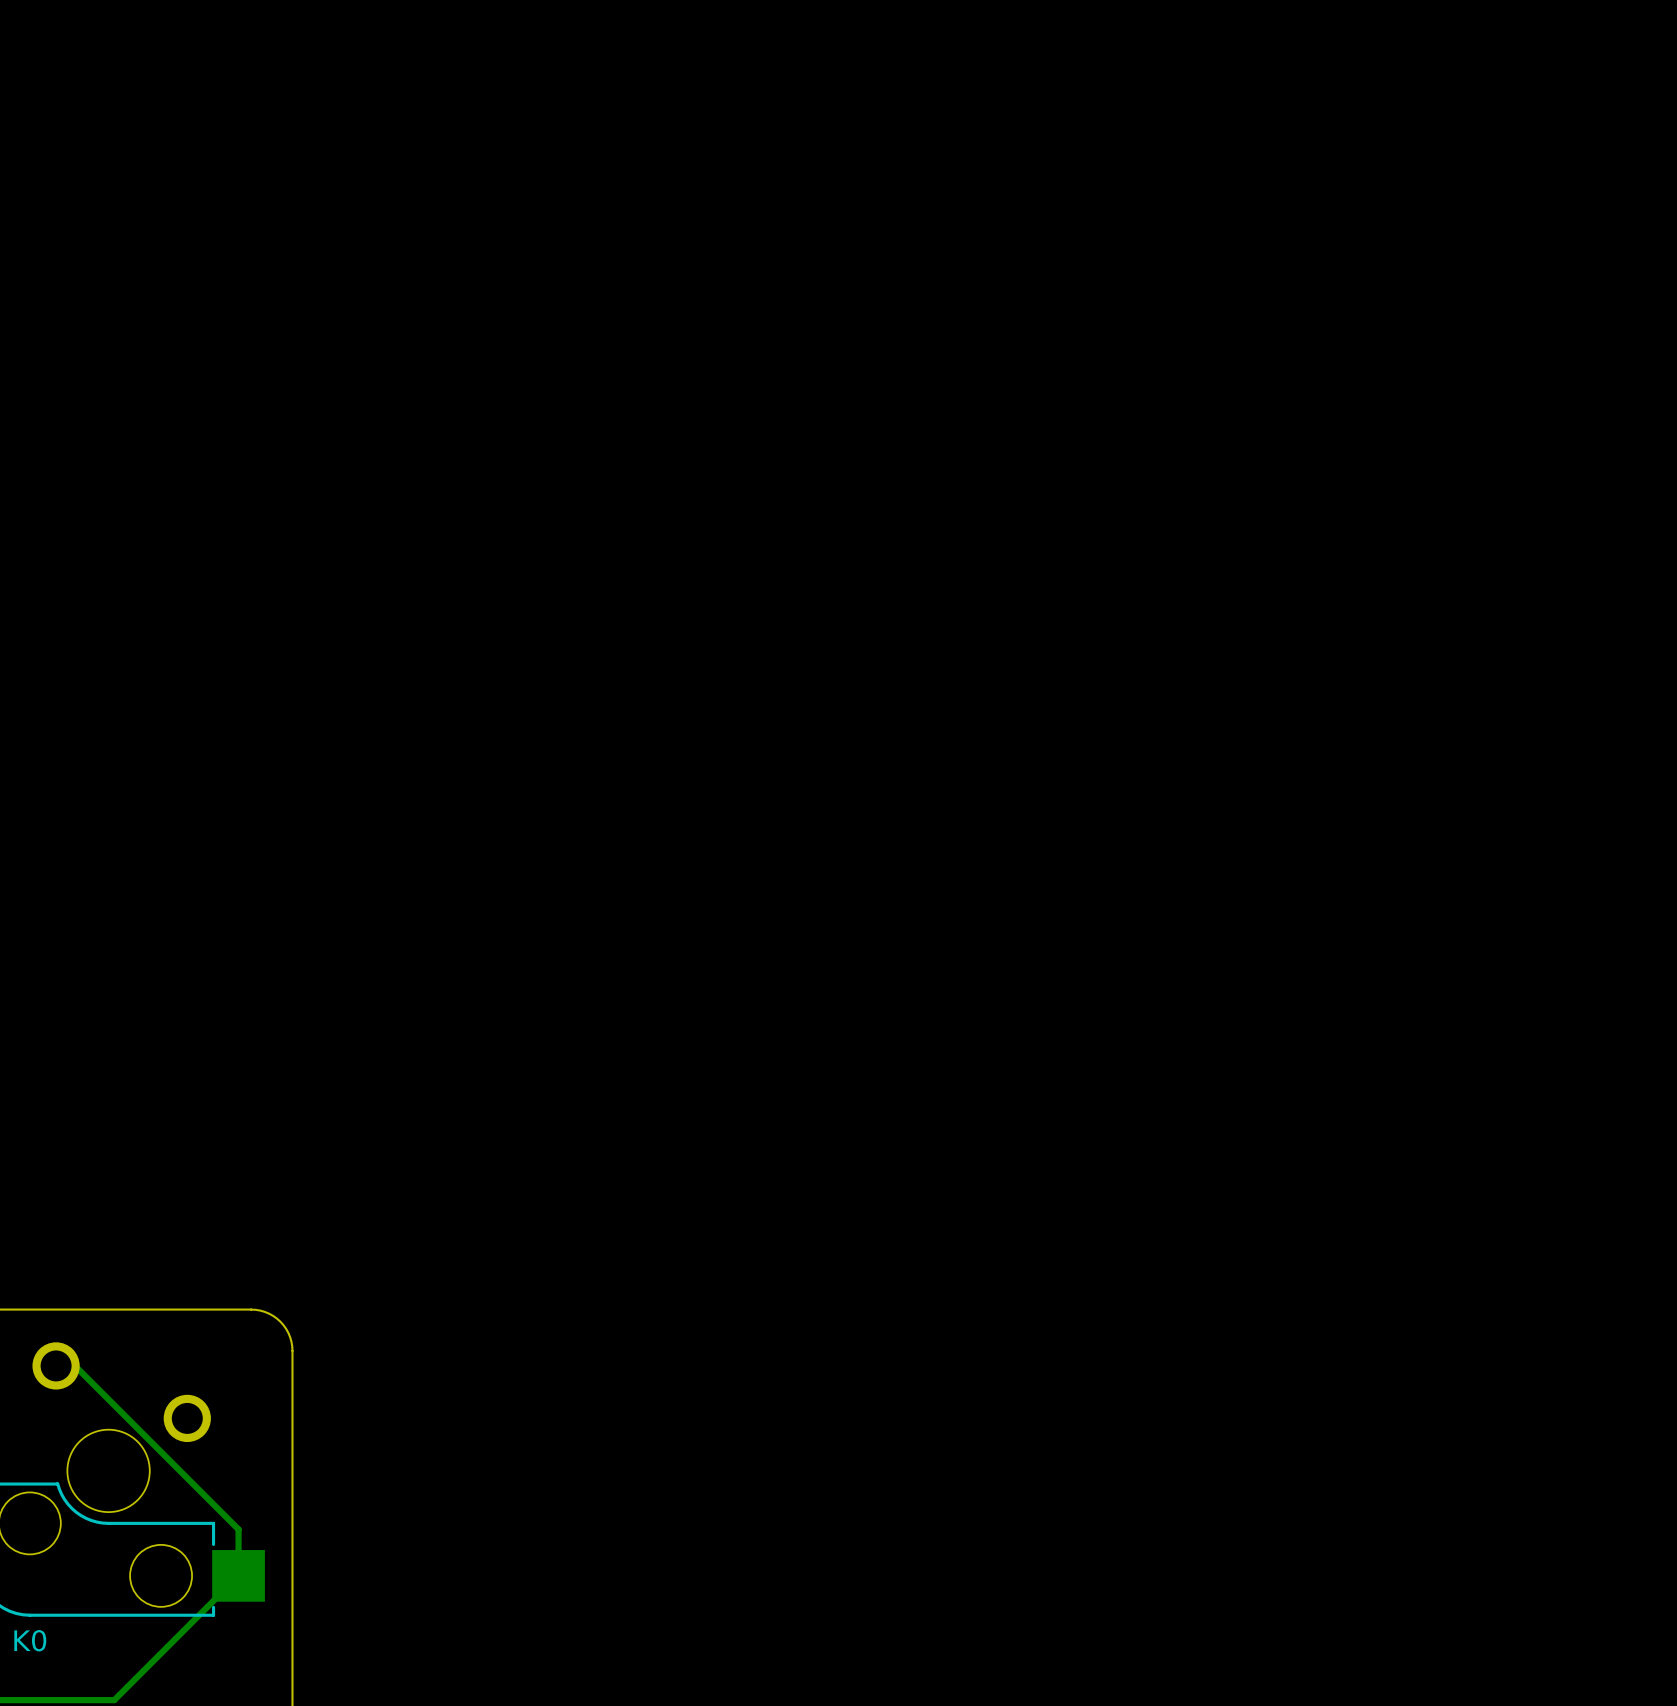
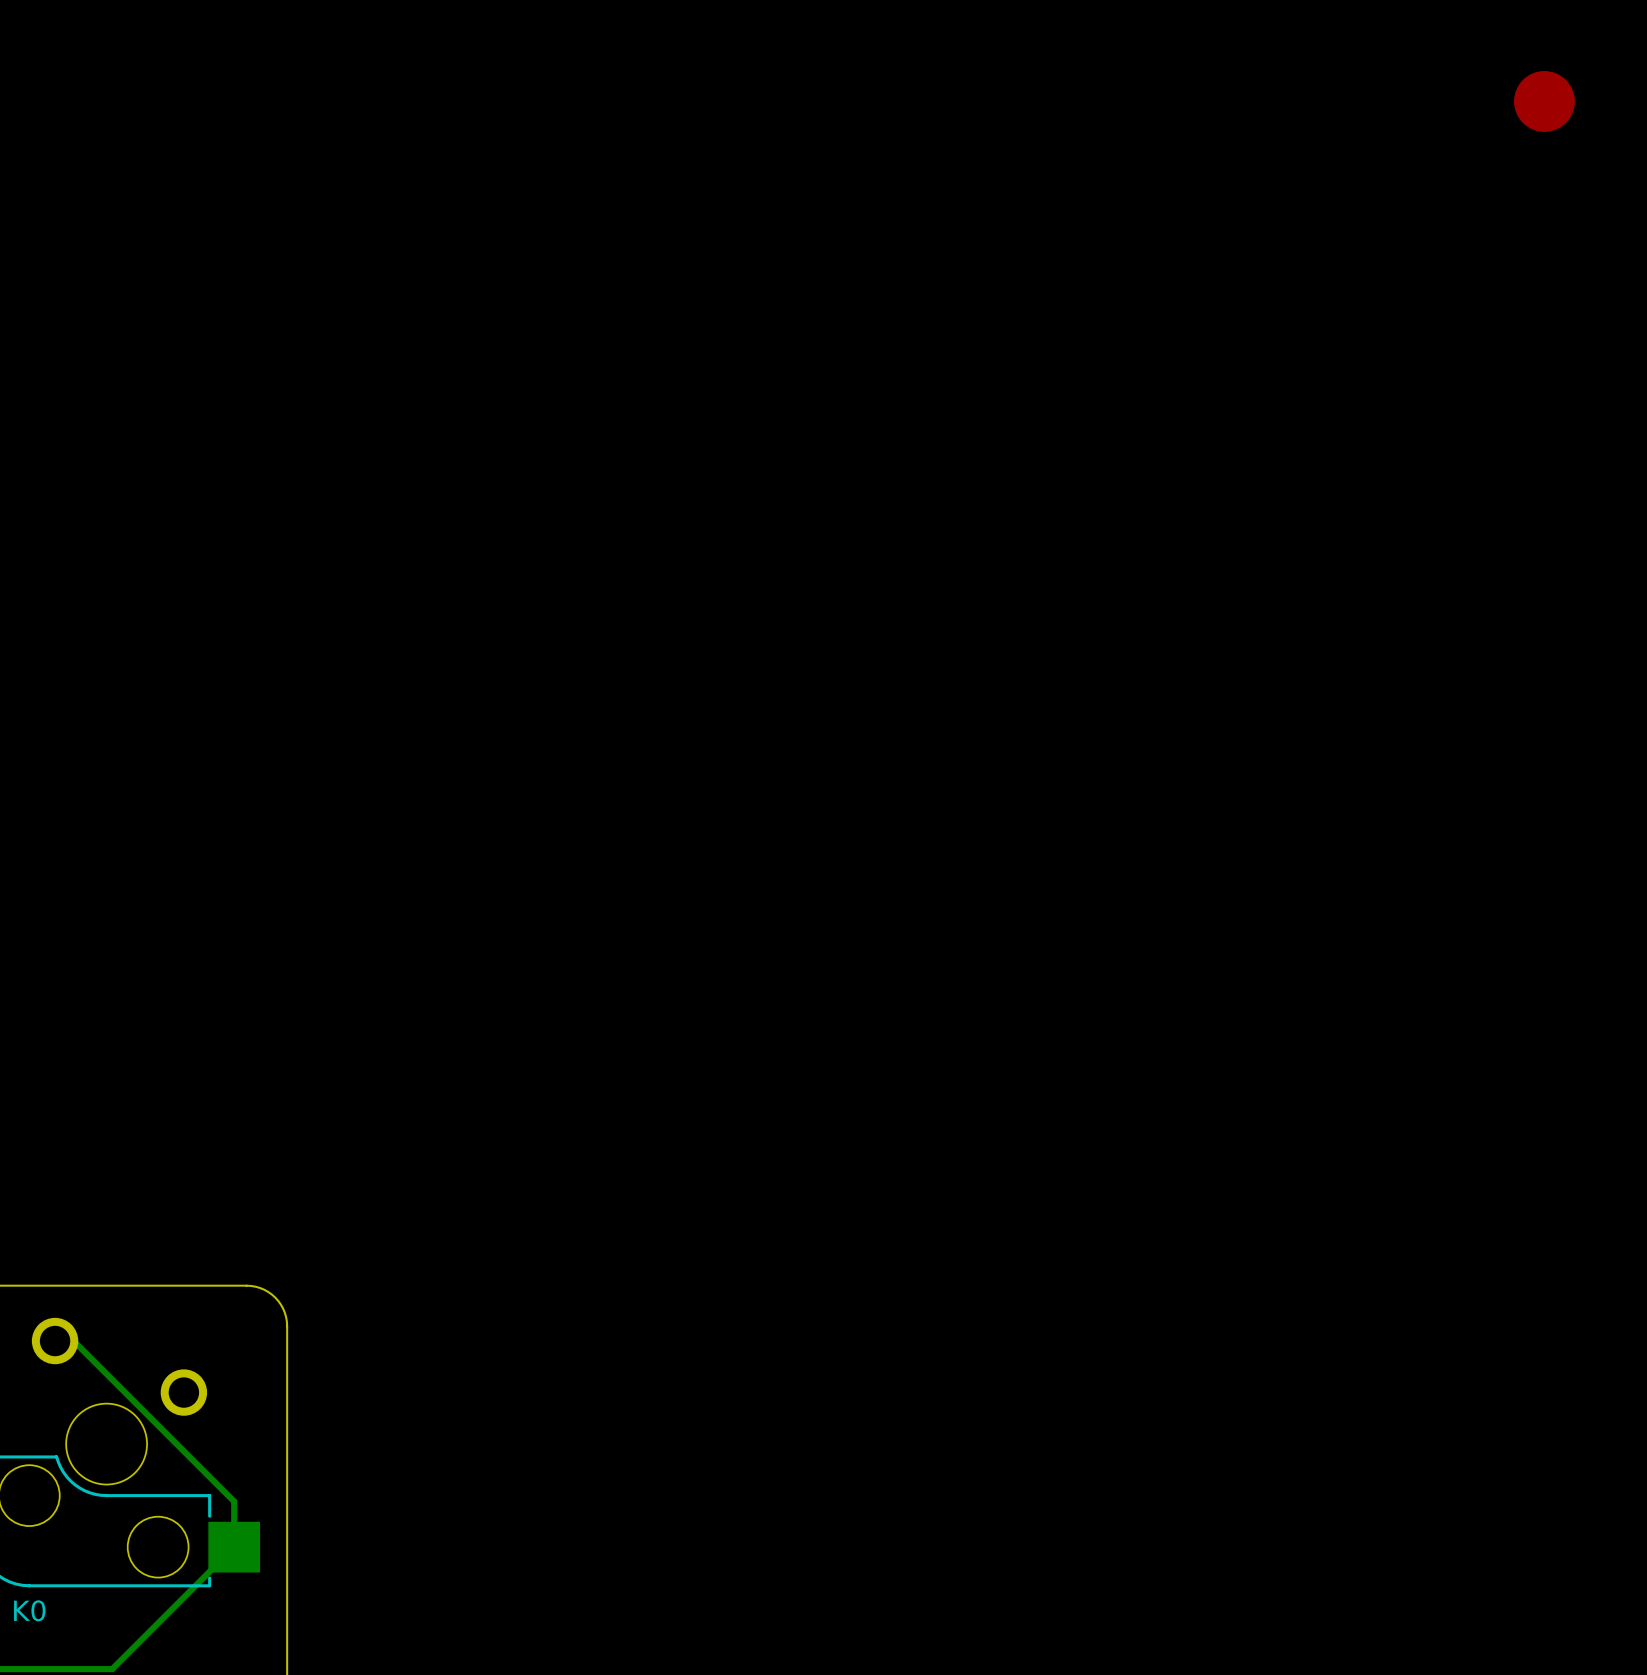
part: none -> (1544, 101)

